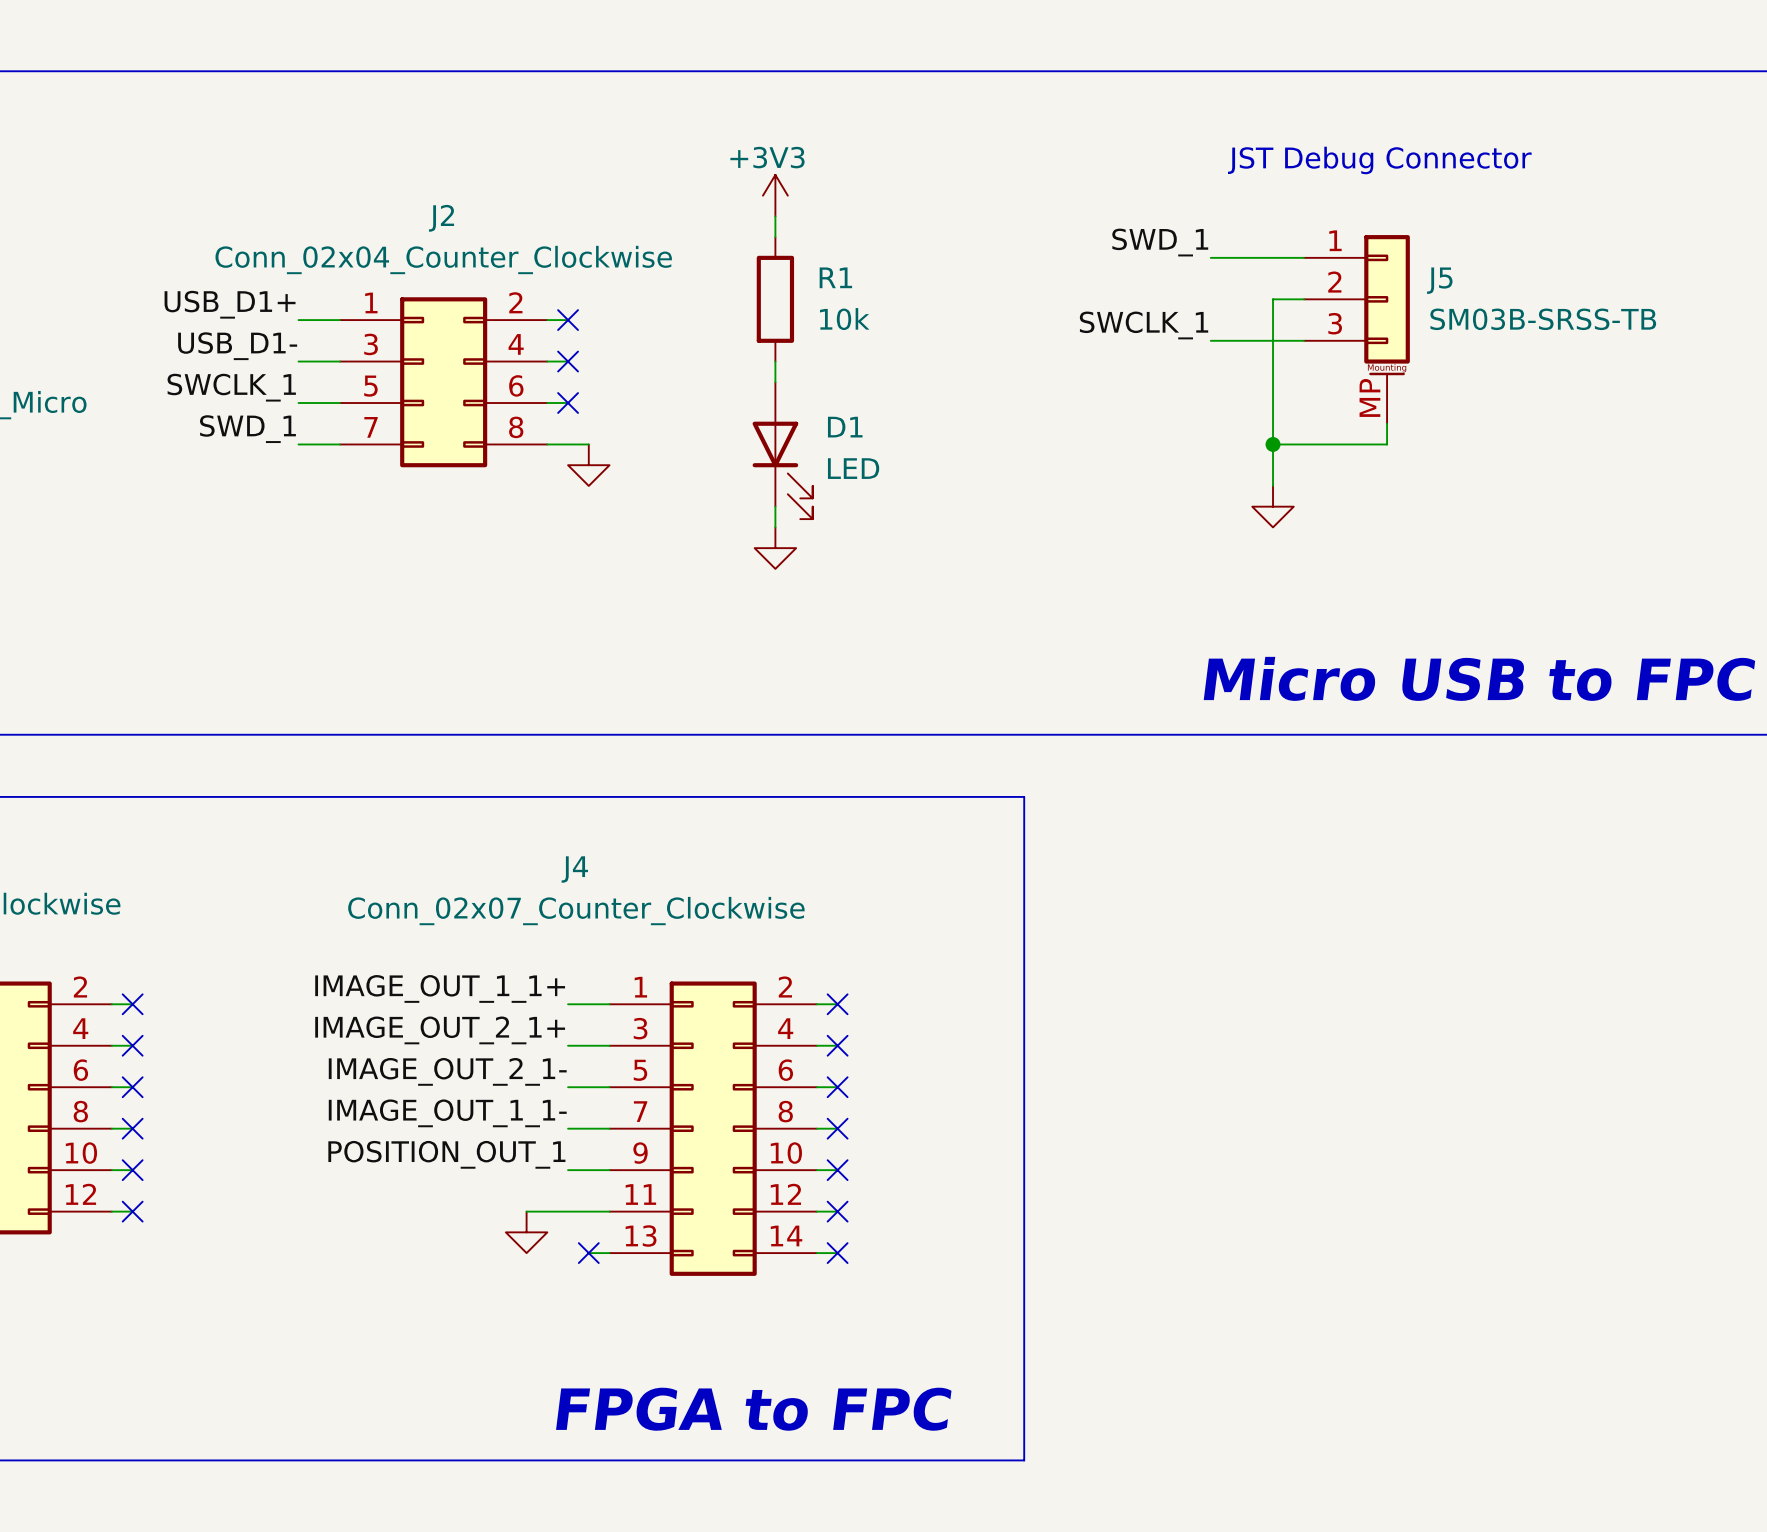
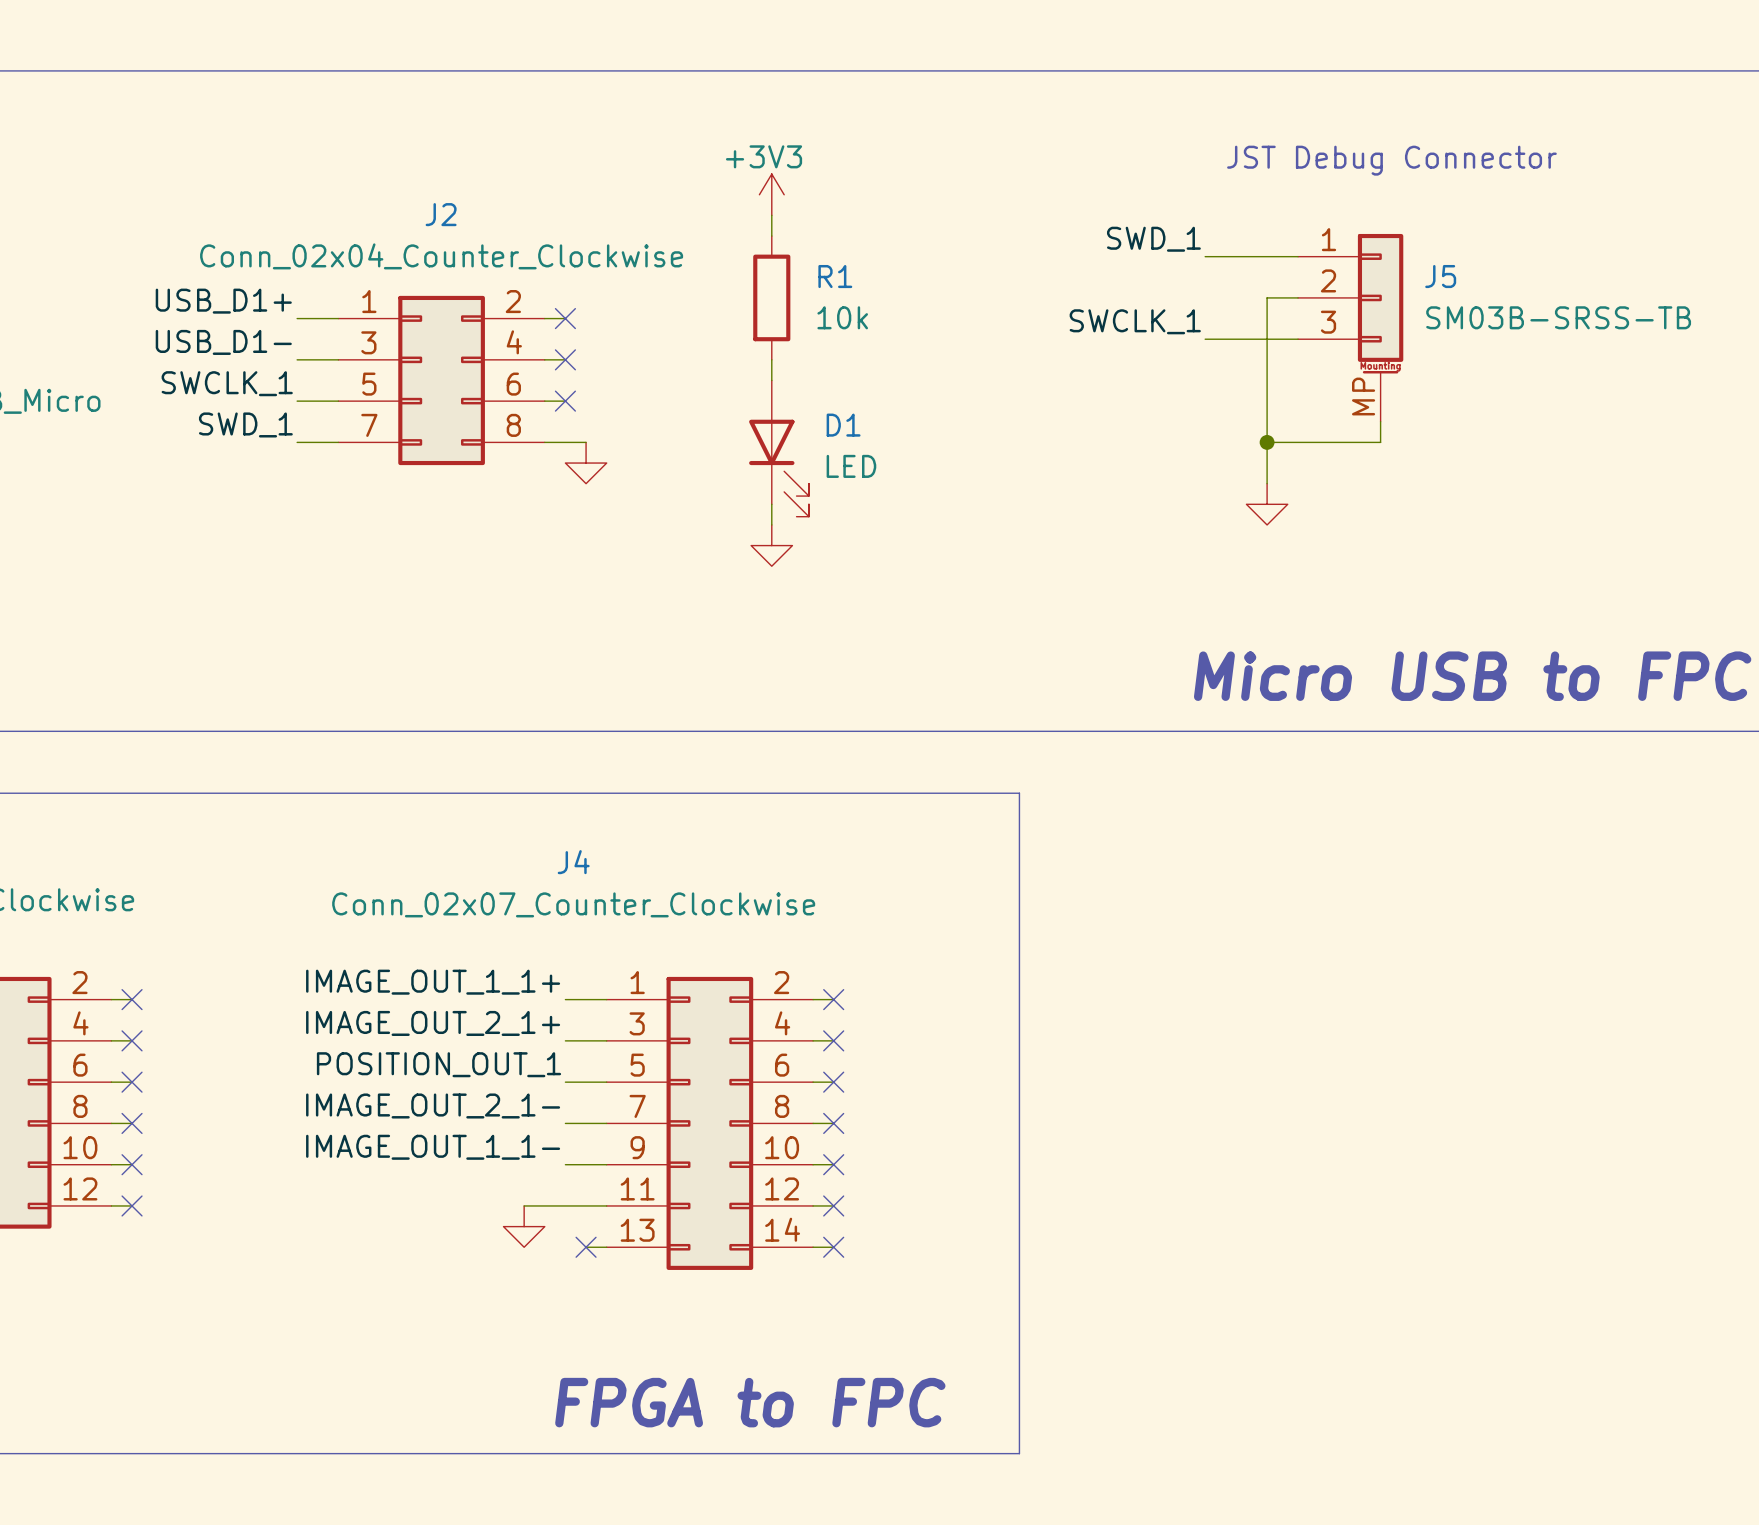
label: IMAGE_OUT_2_1- (447, 1071) -> POSITION_OUT_1 (438, 1064)
label: IMAGE_OUT_1_1- (447, 1113) -> IMAGE_OUT_2_1- (433, 1105)
label: POSITION_OUT_1 (446, 1154) -> IMAGE_OUT_1_1- (433, 1147)

